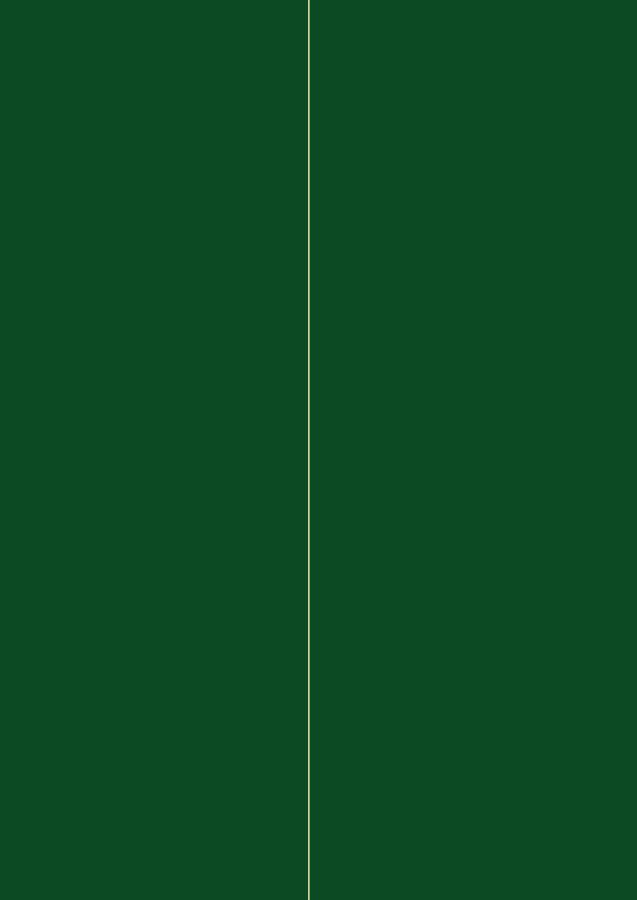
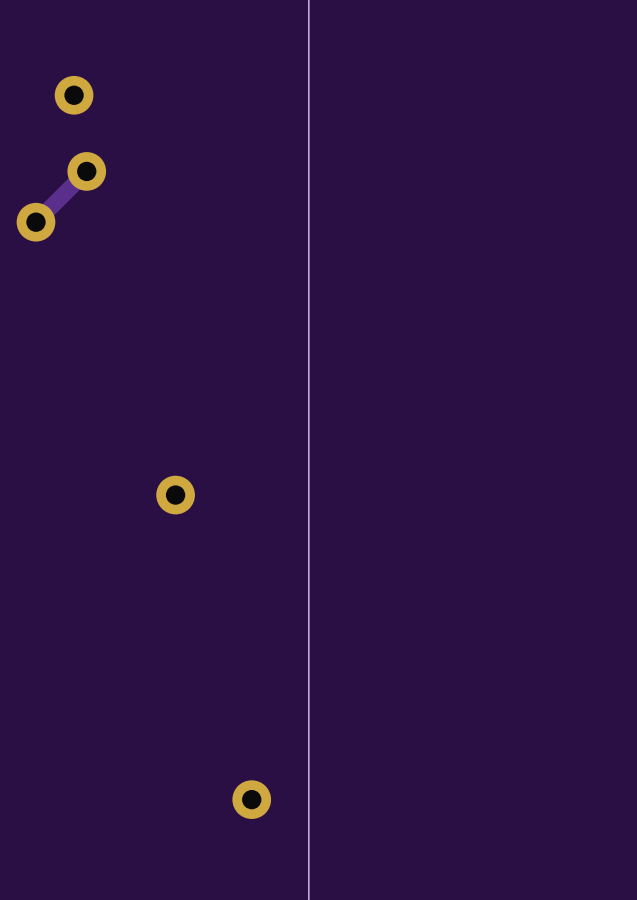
via: none -> (74, 95)
track: none -> (86, 171) (35, 222)
via: none -> (86, 171)
via: none -> (35, 222)
via: none -> (175, 495)
via: none -> (251, 799)

